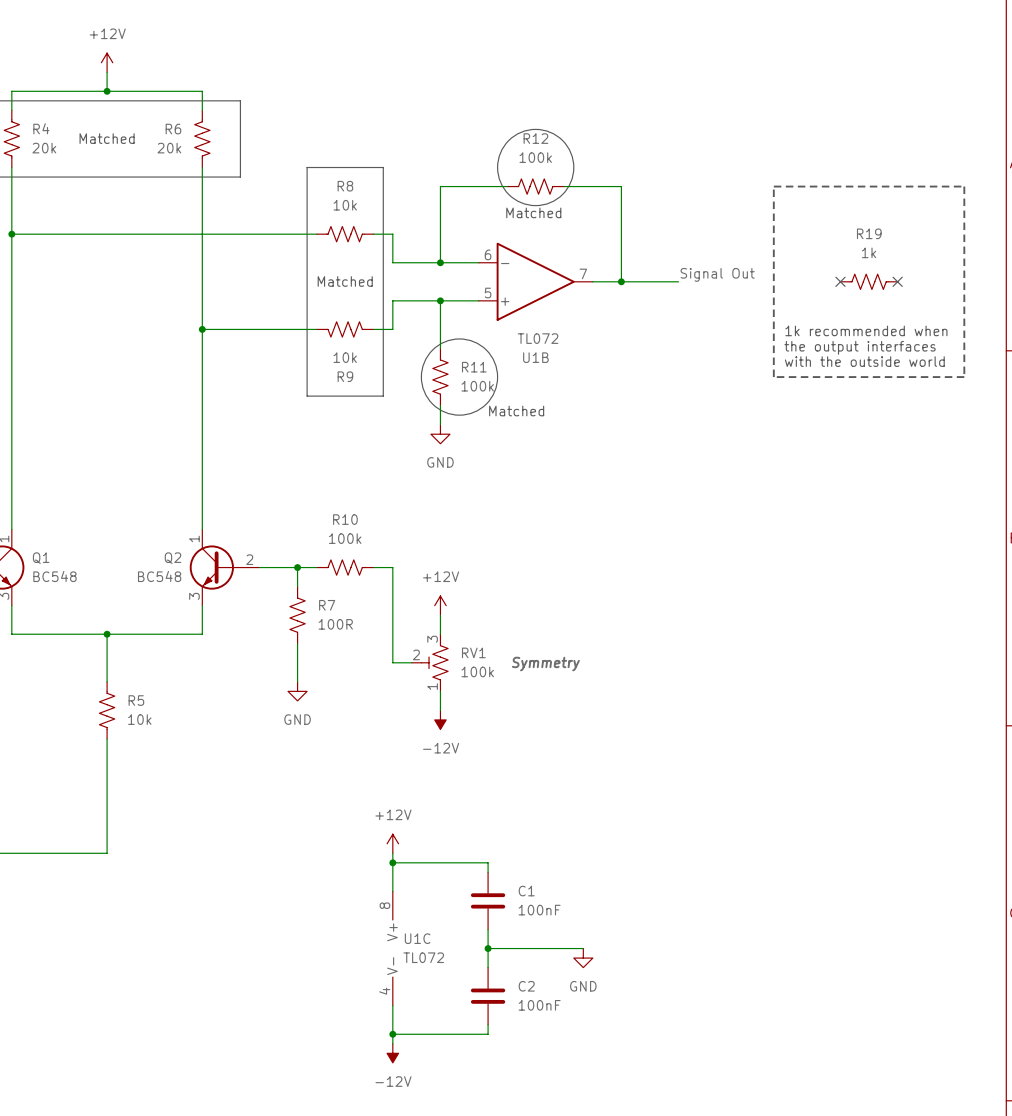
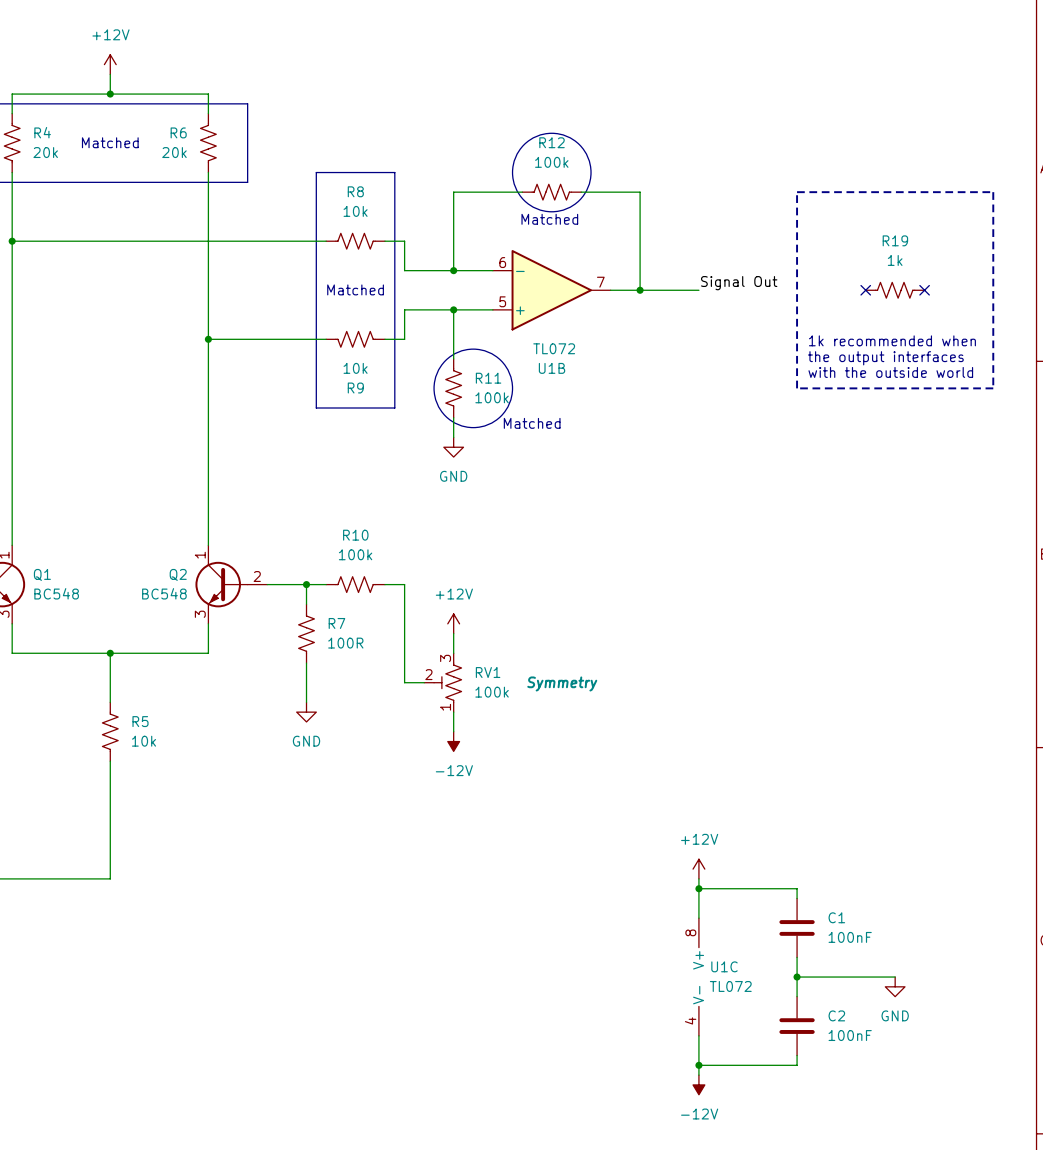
power symbol: +12V (392, 843) -> none
power symbol: none -> +12V (698, 869)
wire: (392, 853) (392, 891) -> none
wire: none -> (698, 878) (698, 918)
wire: (392, 862) (488, 862) (488, 872) -> none
junction: (392, 862) -> none
wire: none -> (698, 888) (797, 888) (797, 898)
junction: none -> (698, 888)
C1 position: (488, 900) -> (797, 927)
wire: (488, 929) (488, 967) -> none
wire: none -> (797, 957) (797, 996)
U1C position: (392, 948) -> (698, 977)
wire: (488, 948) (583, 948) -> none
junction: (488, 948) -> none
wire: none -> (797, 977) (895, 977)
junction: none -> (797, 977)
power symbol: GND (583, 958) -> none
power symbol: none -> GND (895, 986)
C2 position: (488, 996) -> (797, 1026)
wire: (392, 1005) (392, 1043) -> none
wire: none -> (698, 1035) (698, 1075)
wire: (488, 1024) (488, 1034) (392, 1034) -> none
wire: none -> (797, 1055) (797, 1065) (698, 1065)
junction: (392, 1034) -> none
junction: none -> (698, 1065)
power symbol: -12V (392, 1053) -> none
power symbol: none -> -12V (698, 1084)

